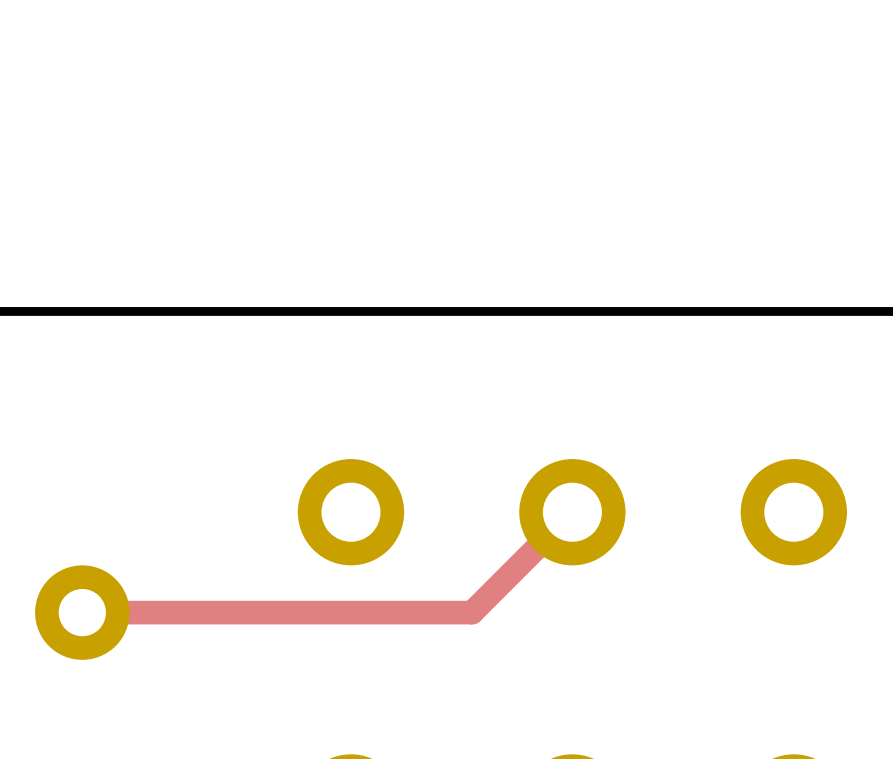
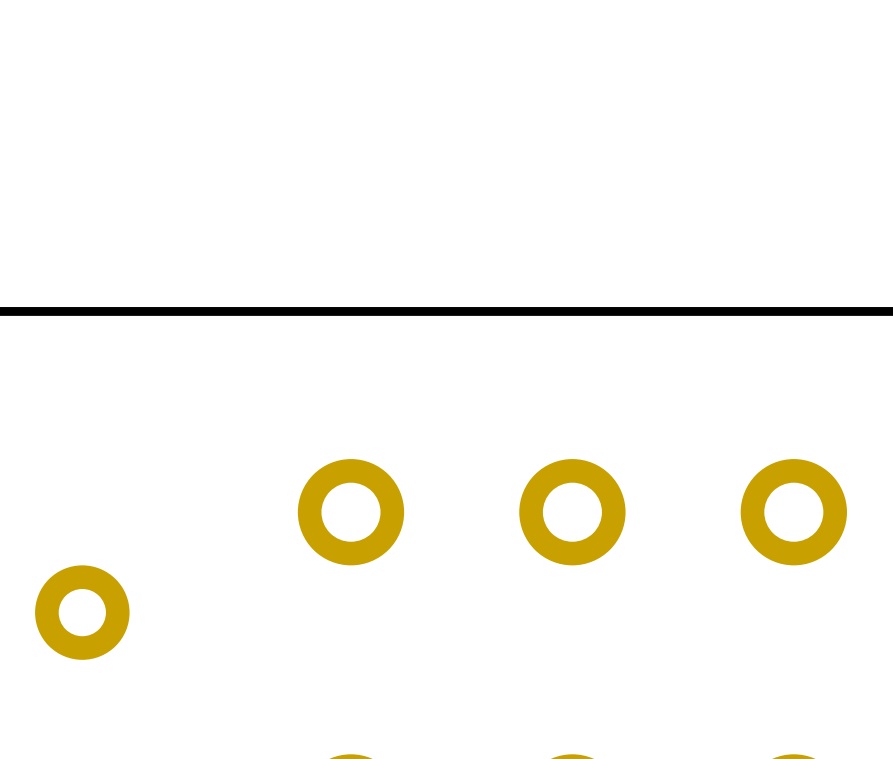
track: (572, 512) (472, 612) (82, 612) -> none

